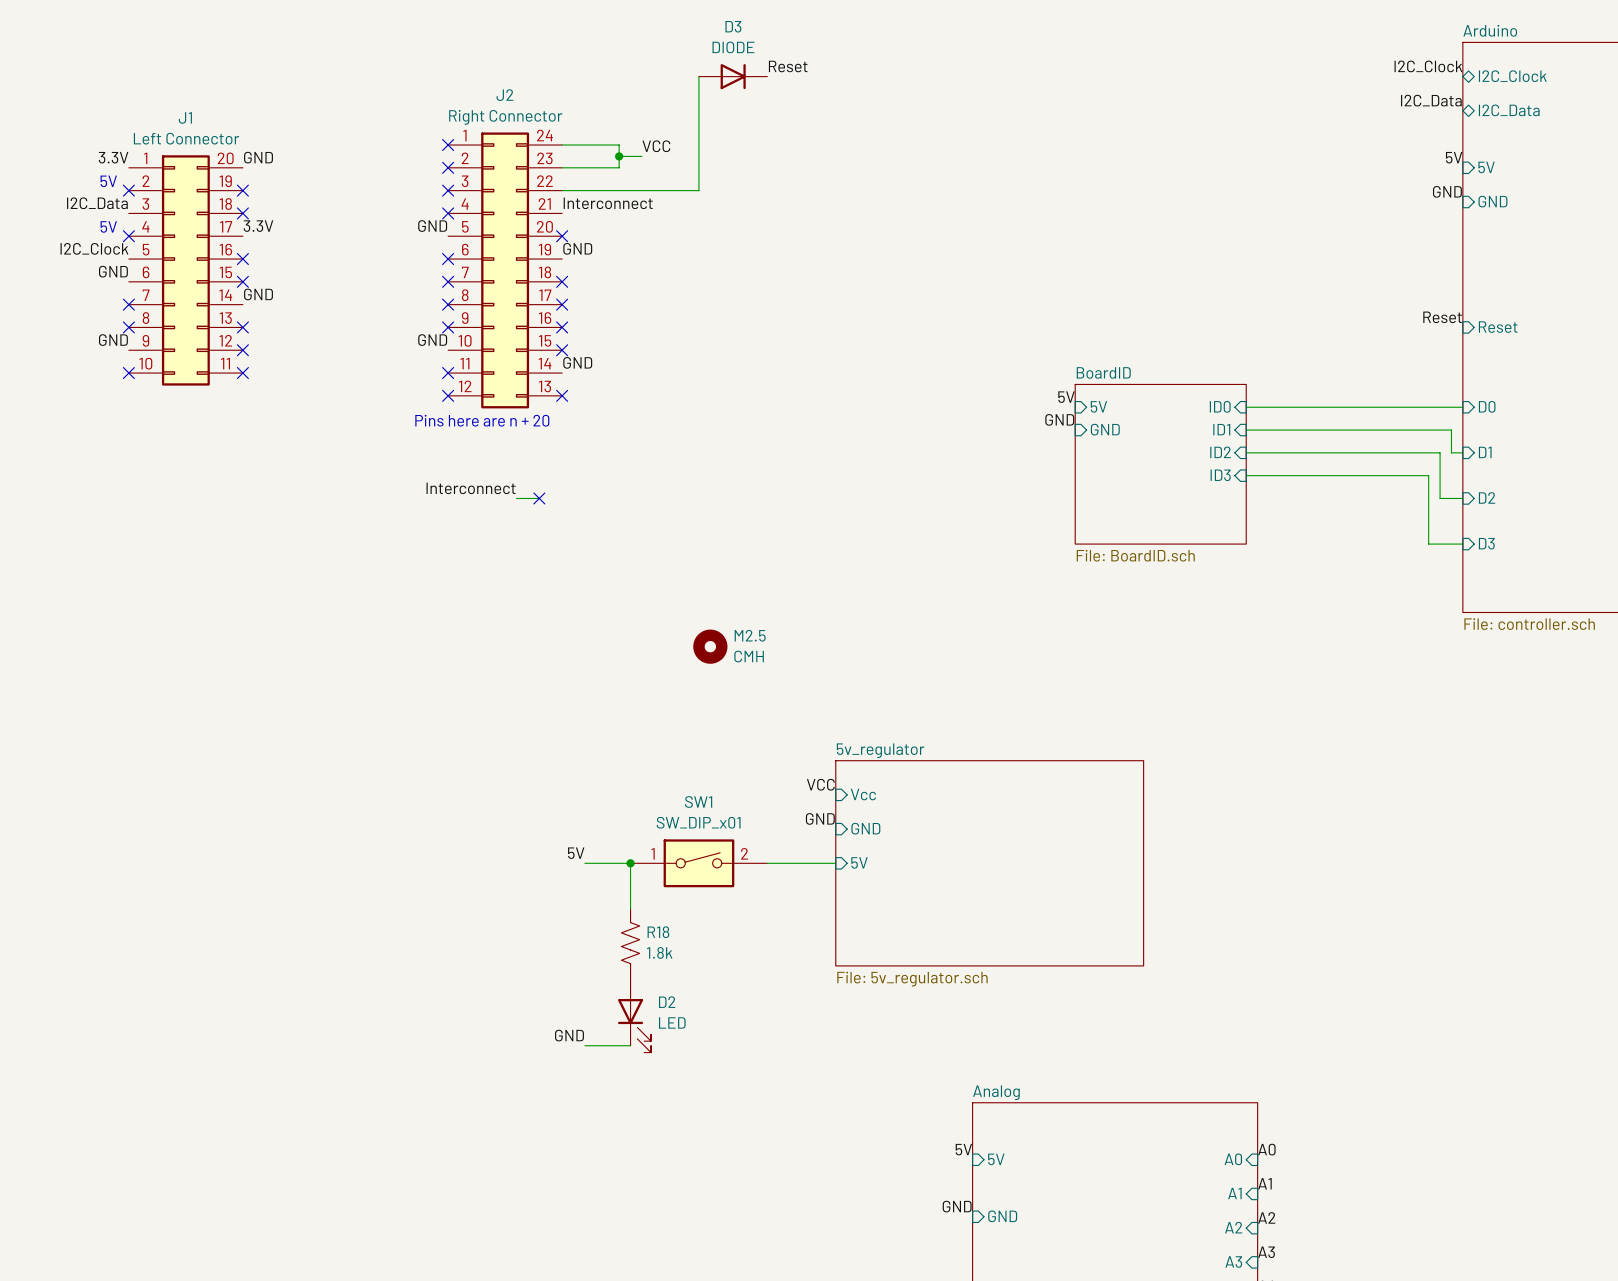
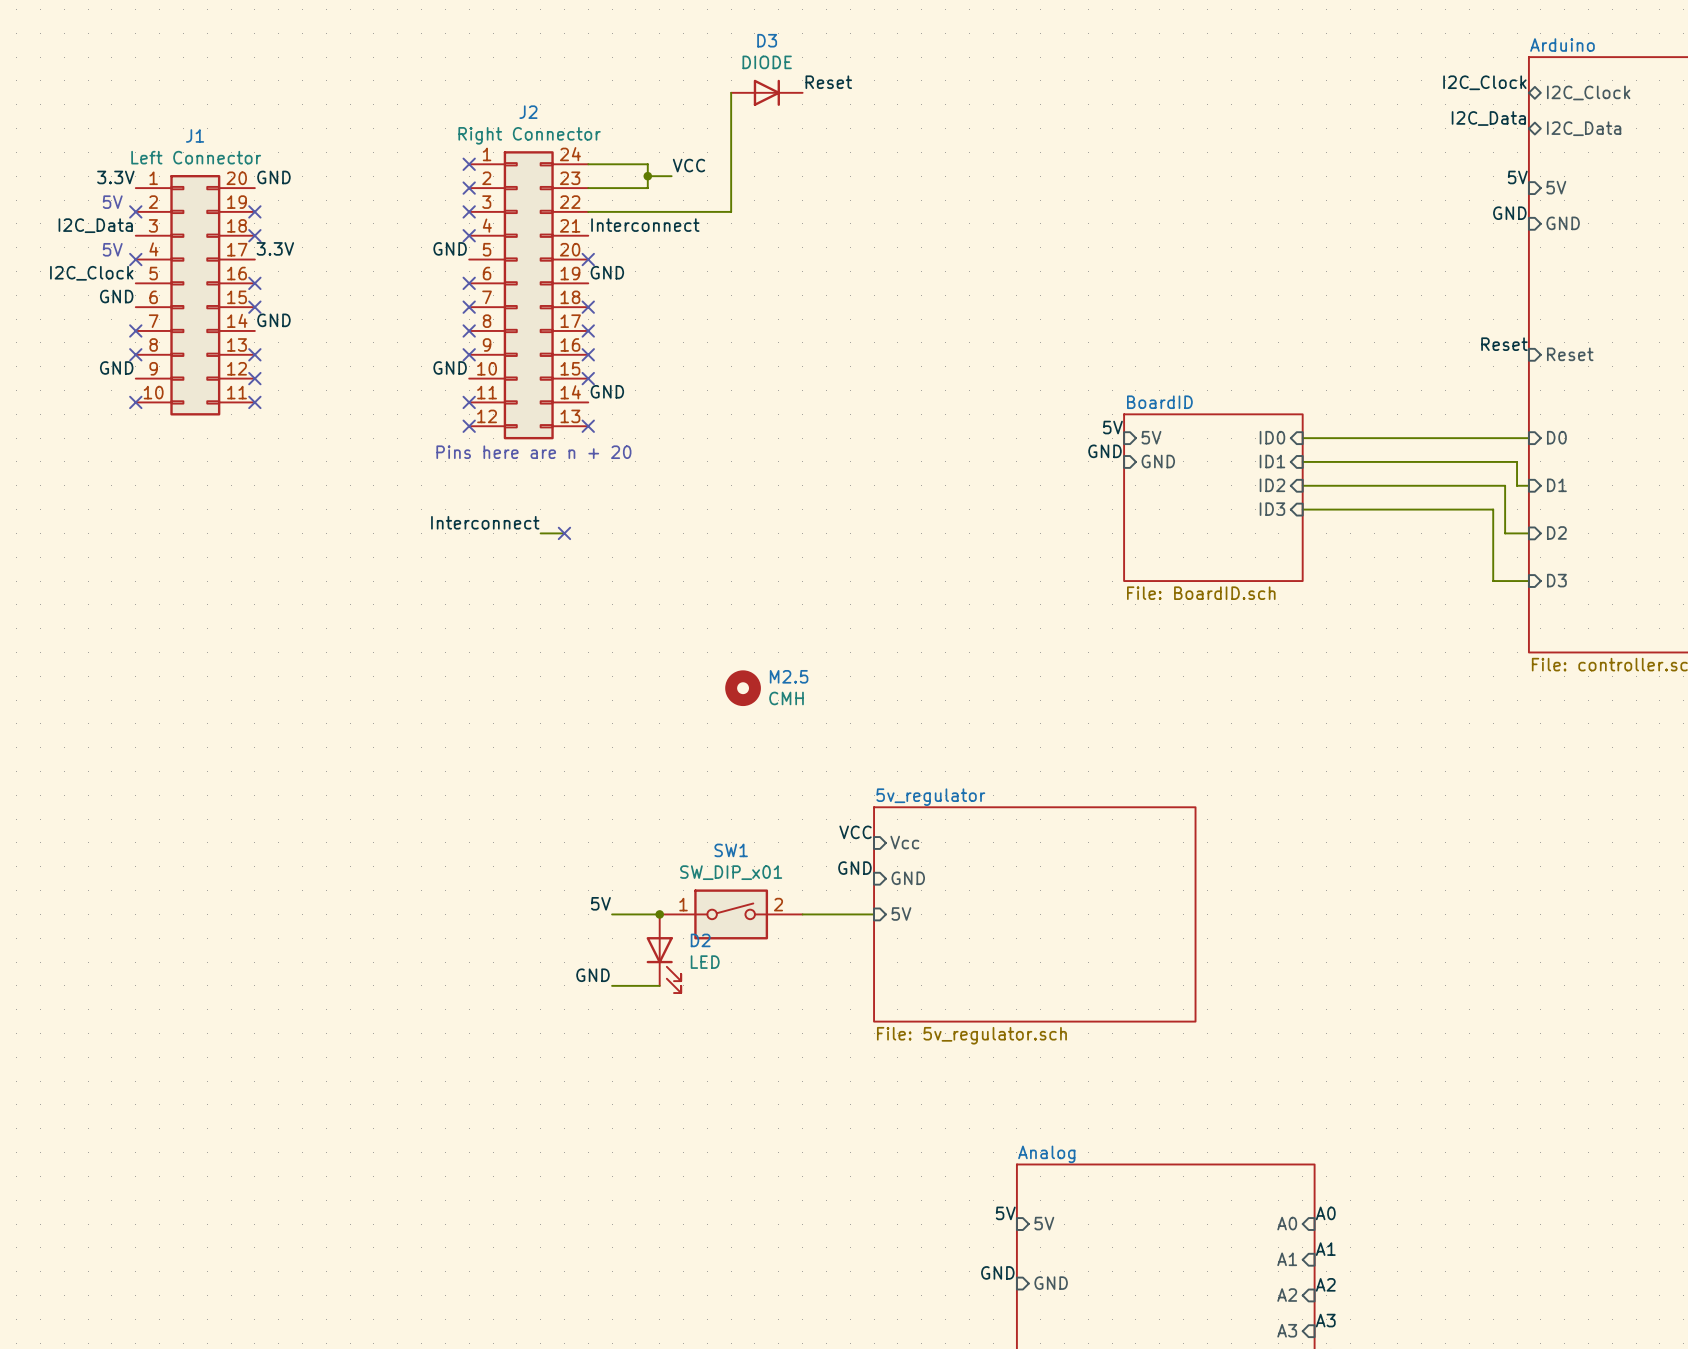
R18: 1.8k (630, 943) -> none
D2 position: (634, 1014) -> (663, 953)
label position: GND (569, 1035) -> GND (592, 975)
wire: (584, 1045) (630, 1045) -> (612, 985) (659, 985)

